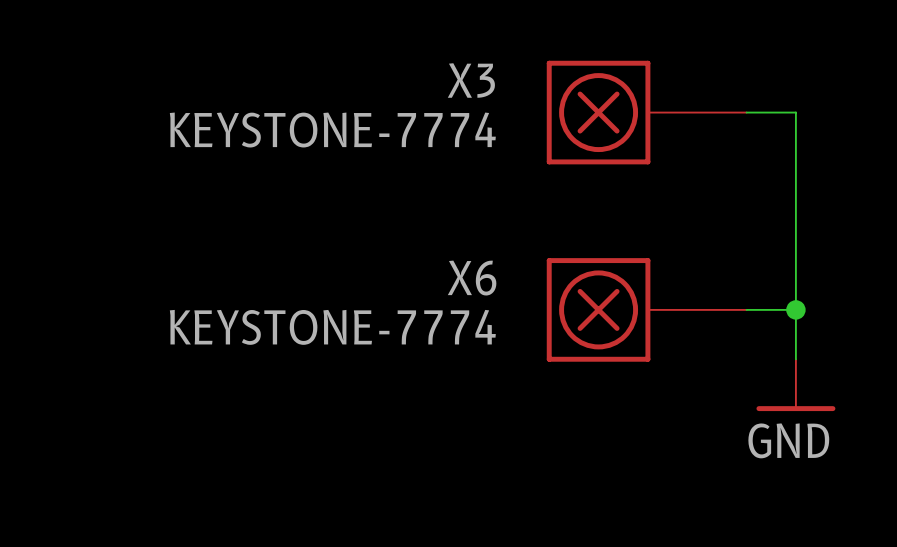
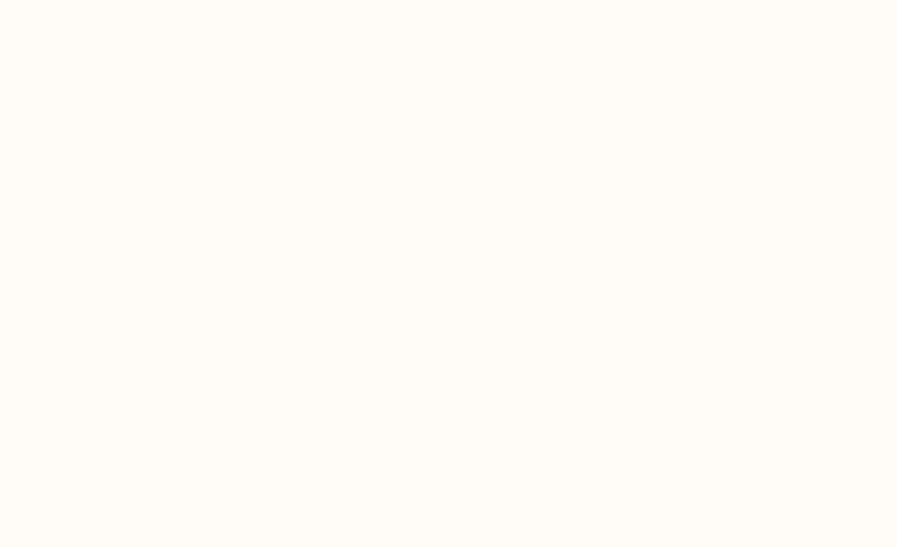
X3: KEYSTONE-7774 (646, 112) -> none
wire: (746, 112) (795, 112) (795, 359) -> none
X6: KEYSTONE-7774 (646, 309) -> none
wire: (746, 309) (795, 309) -> none
junction: (795, 309) -> none
power symbol: GND (795, 385) -> none

